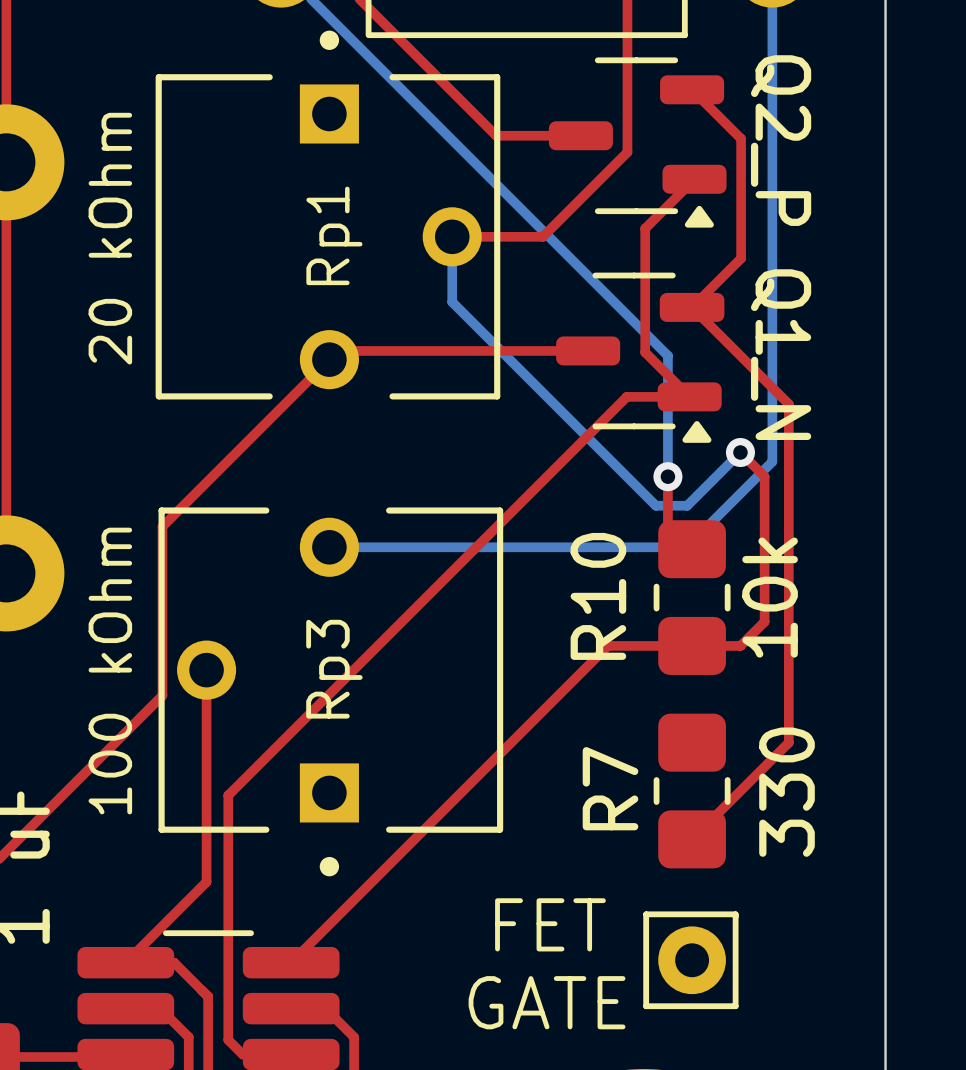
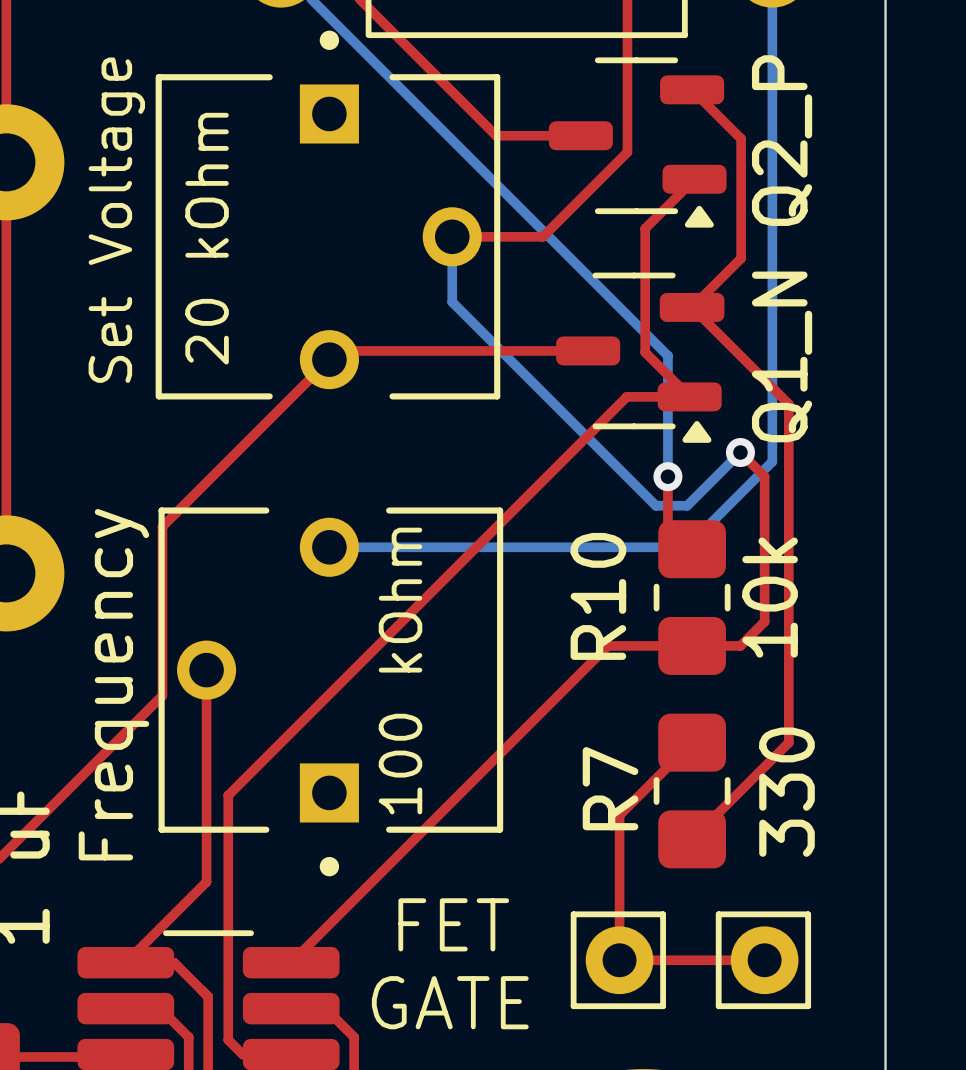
Q2_P name rotation: 0° (781, 140) -> 180° (782, 140)
text: none -> Set Voltage (116, 220)
Rp1 name: Rp1 (334, 235) -> none
Rp1 value position: 20 kOhm (110, 238) -> 20 kOhm (207, 238)
Q1_N name rotation: 0° (781, 354) -> 180° (782, 356)
Rp3 name: Rp3 (334, 669) -> none
Rp3 value position: 100 kOhm (110, 671) -> 100 kOhm (400, 671)
text: none -> Frequency (113, 684)
top track: none -> (692, 742) (619, 815) (619, 960) (764, 960)
text position: FET (550, 924) -> FET (453, 924)
part: none -> (618, 960)
part: (690, 960) -> none
part: none -> (763, 960)
text position: GATE (547, 1002) -> GATE (450, 1002)

